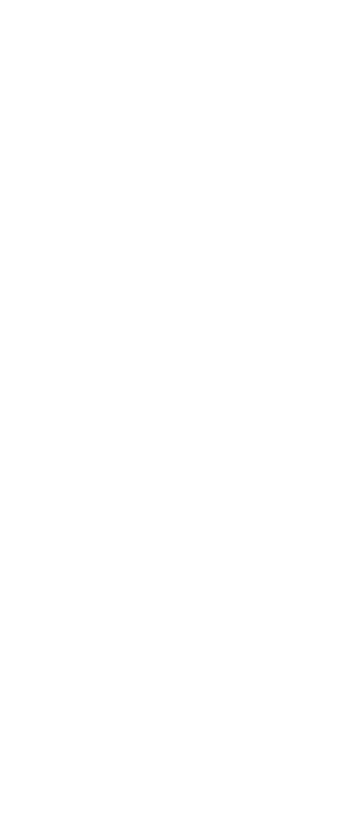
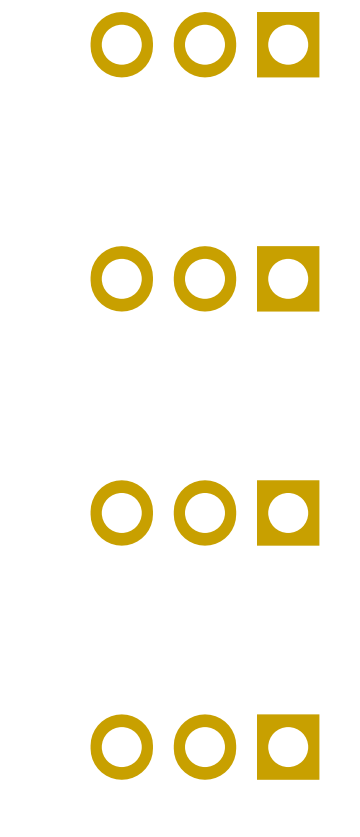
part: none -> (204, 44)
part: none -> (204, 278)
part: none -> (204, 512)
part: none -> (204, 747)

